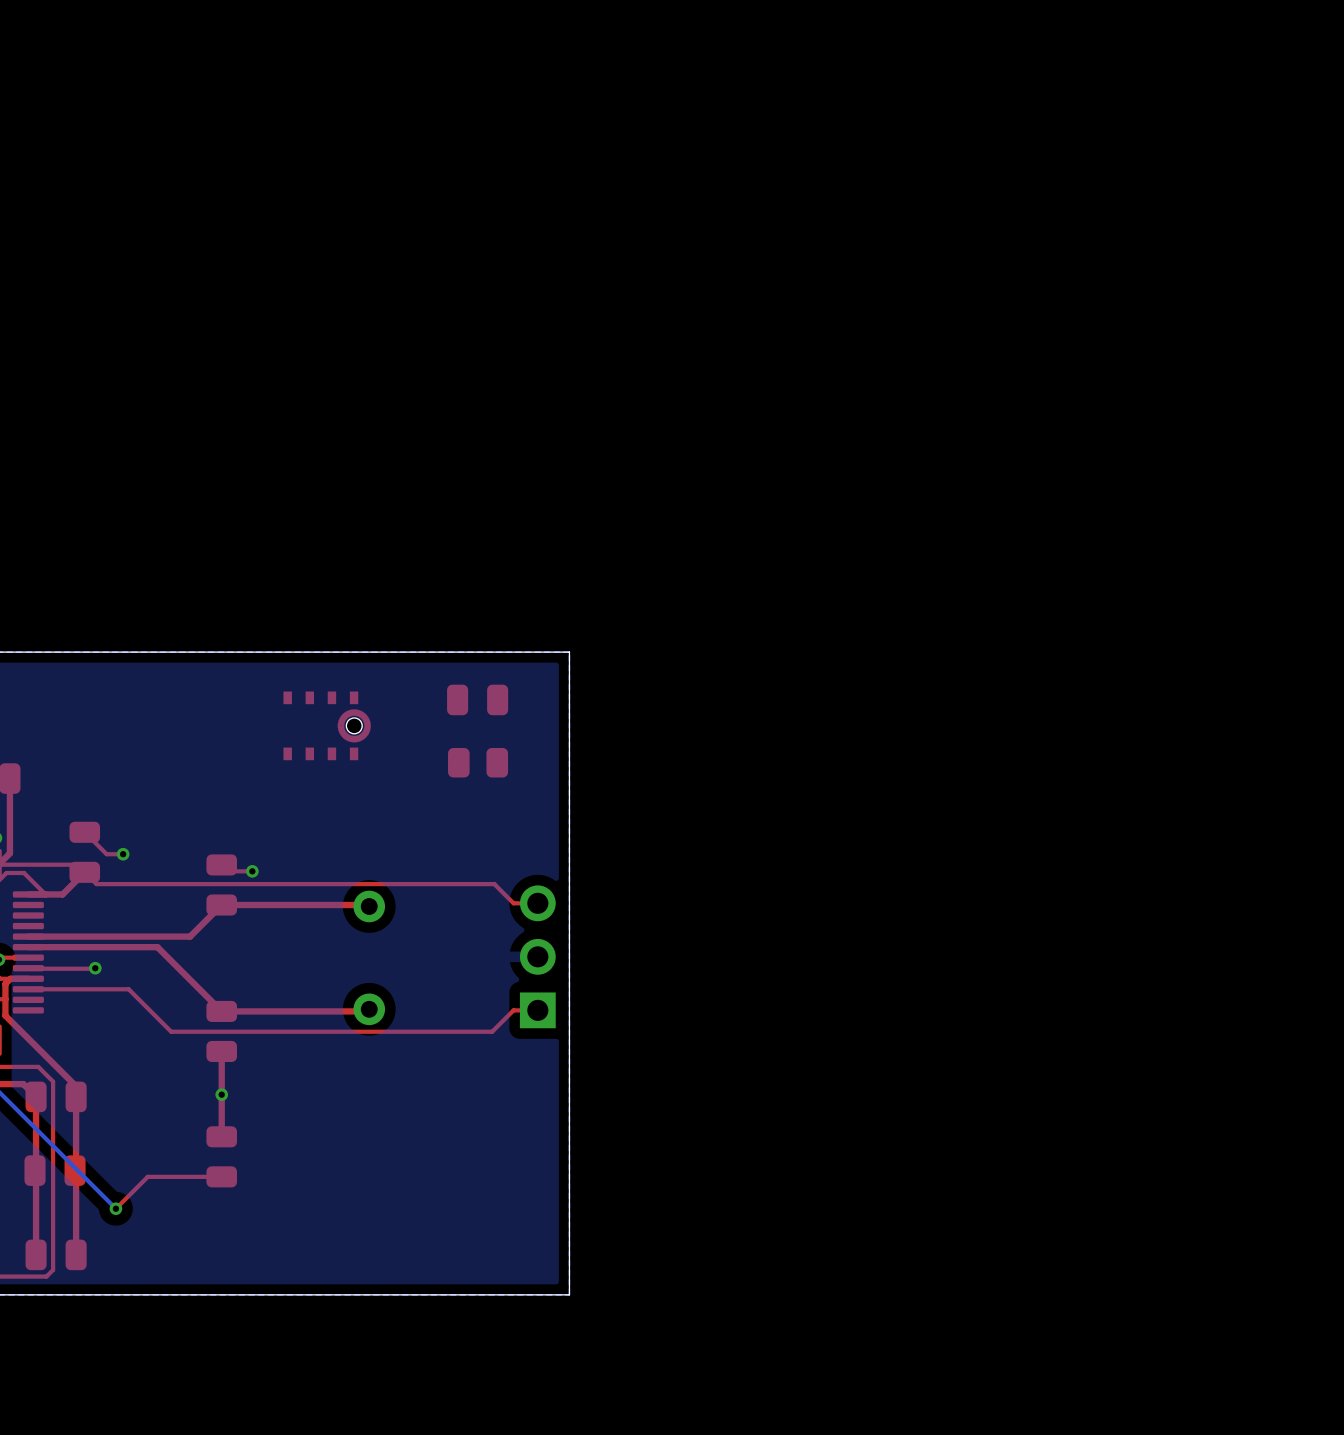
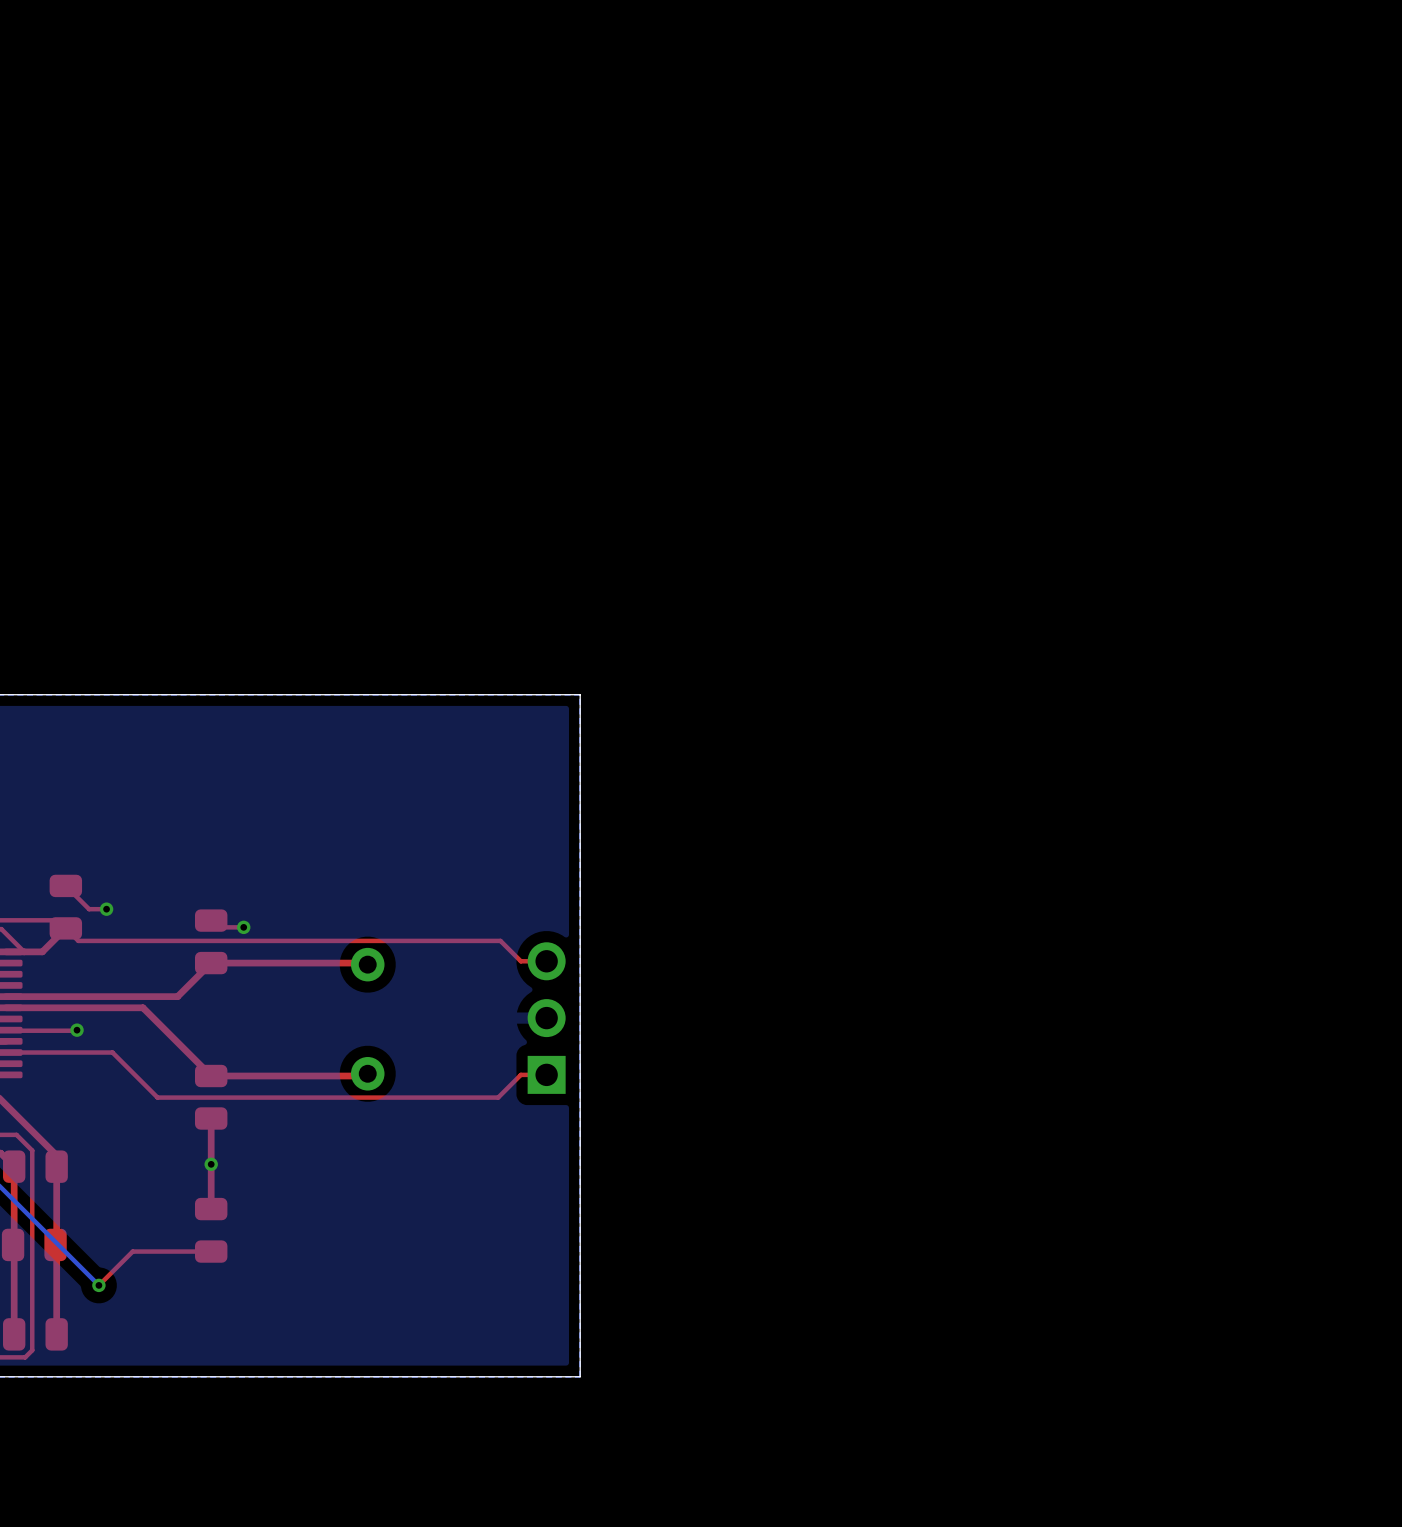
part: (477, 699) -> none
part: (327, 725) -> none
part: (478, 762) -> none

